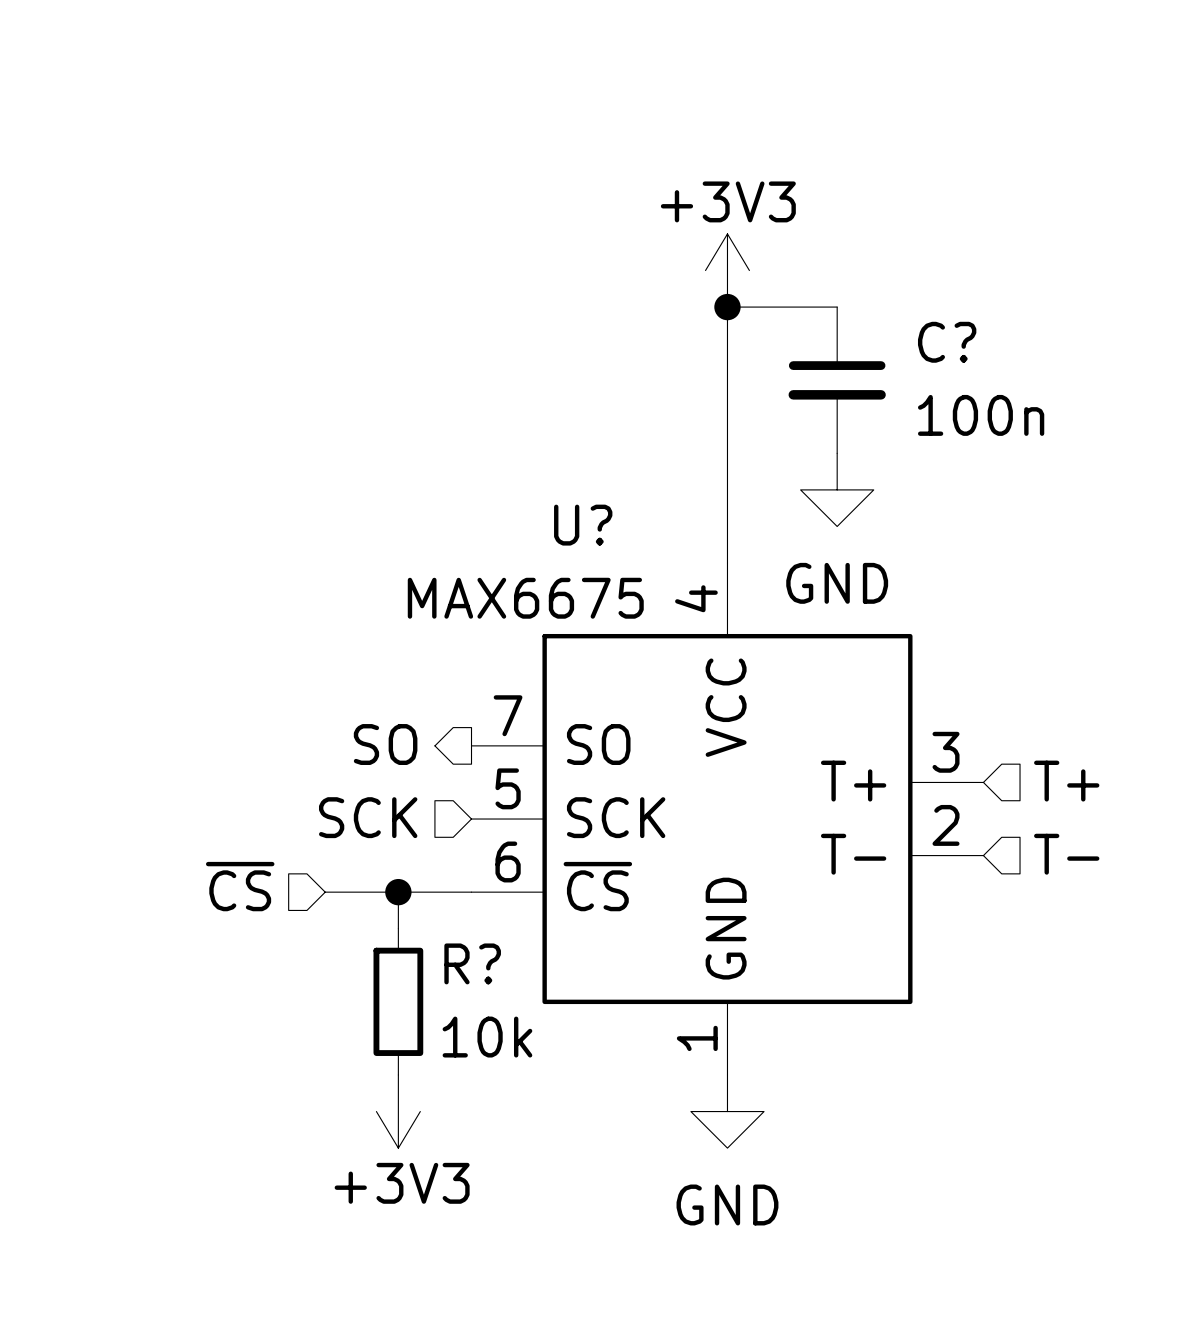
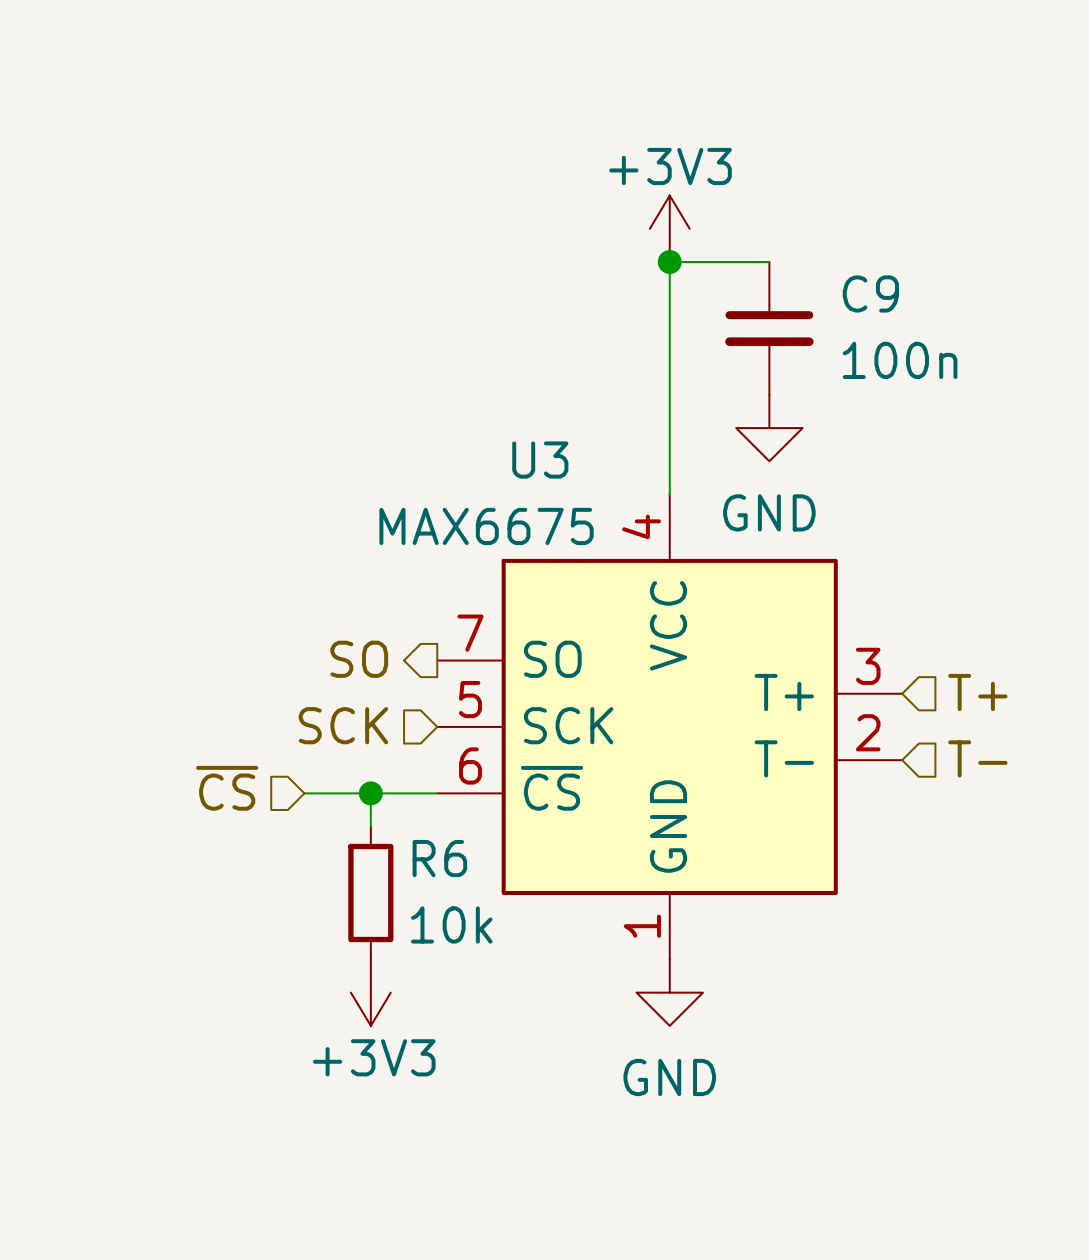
C? name: C? (947, 342) -> C9 (870, 293)
U? name: U? (583, 525) -> U3 (540, 460)
R? name: R? (472, 963) -> R6 (439, 858)

